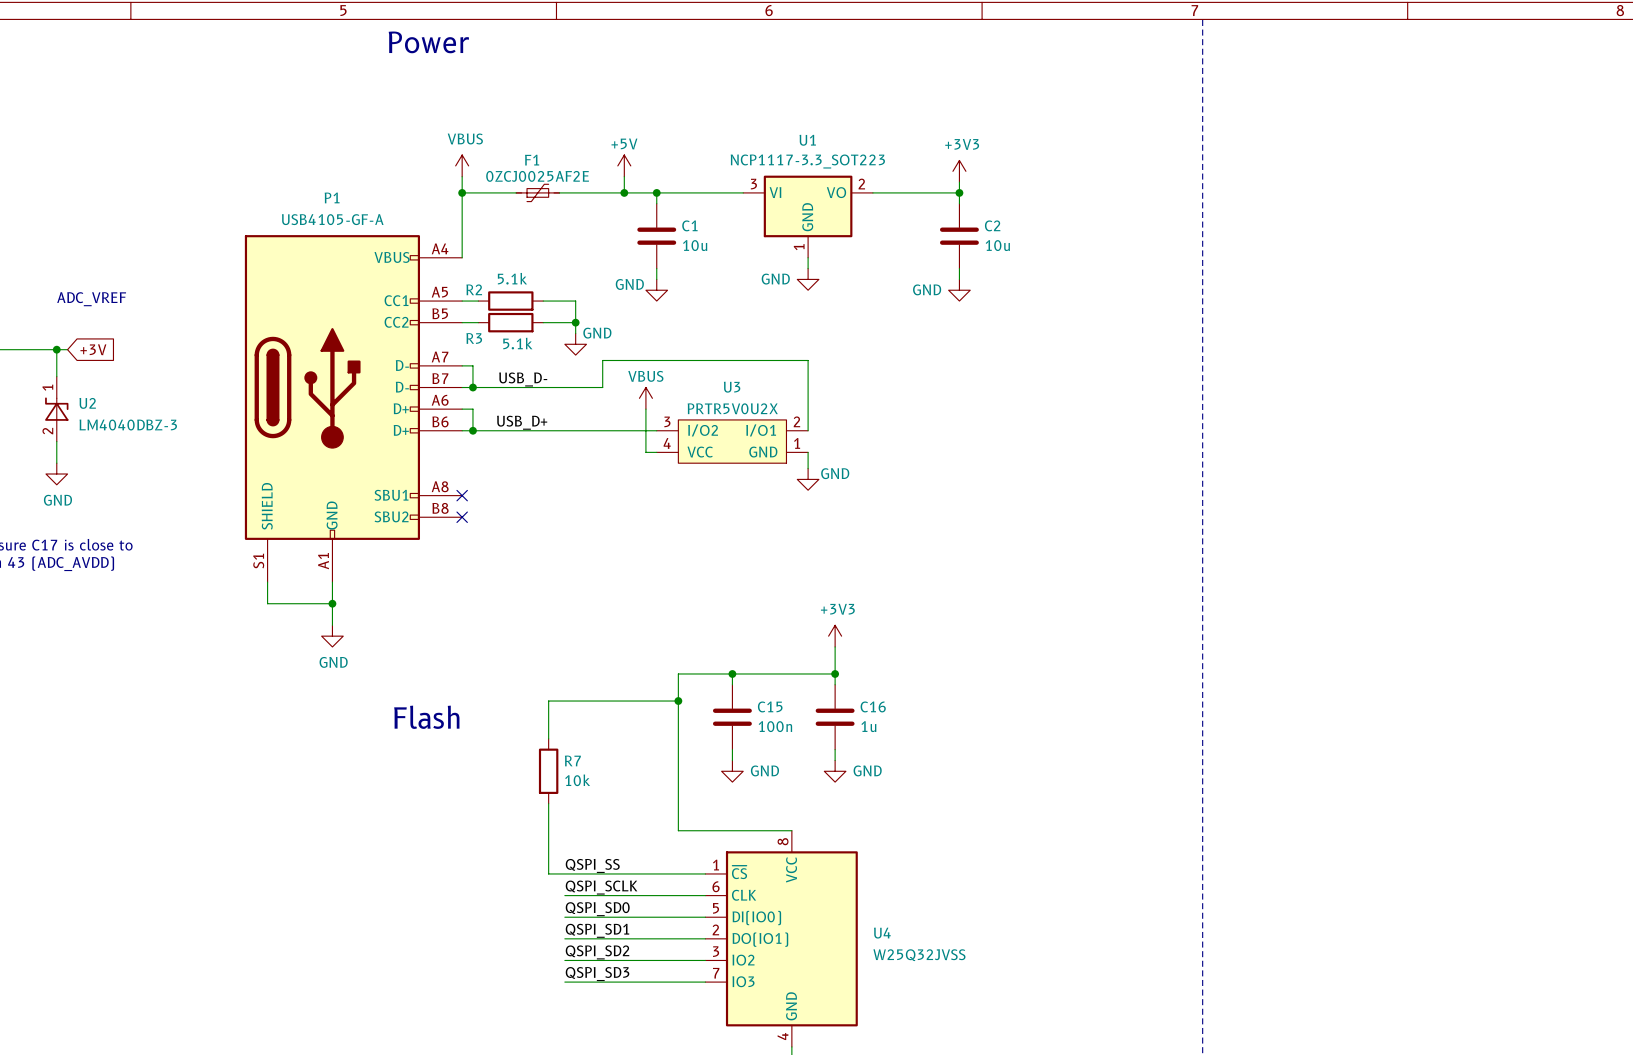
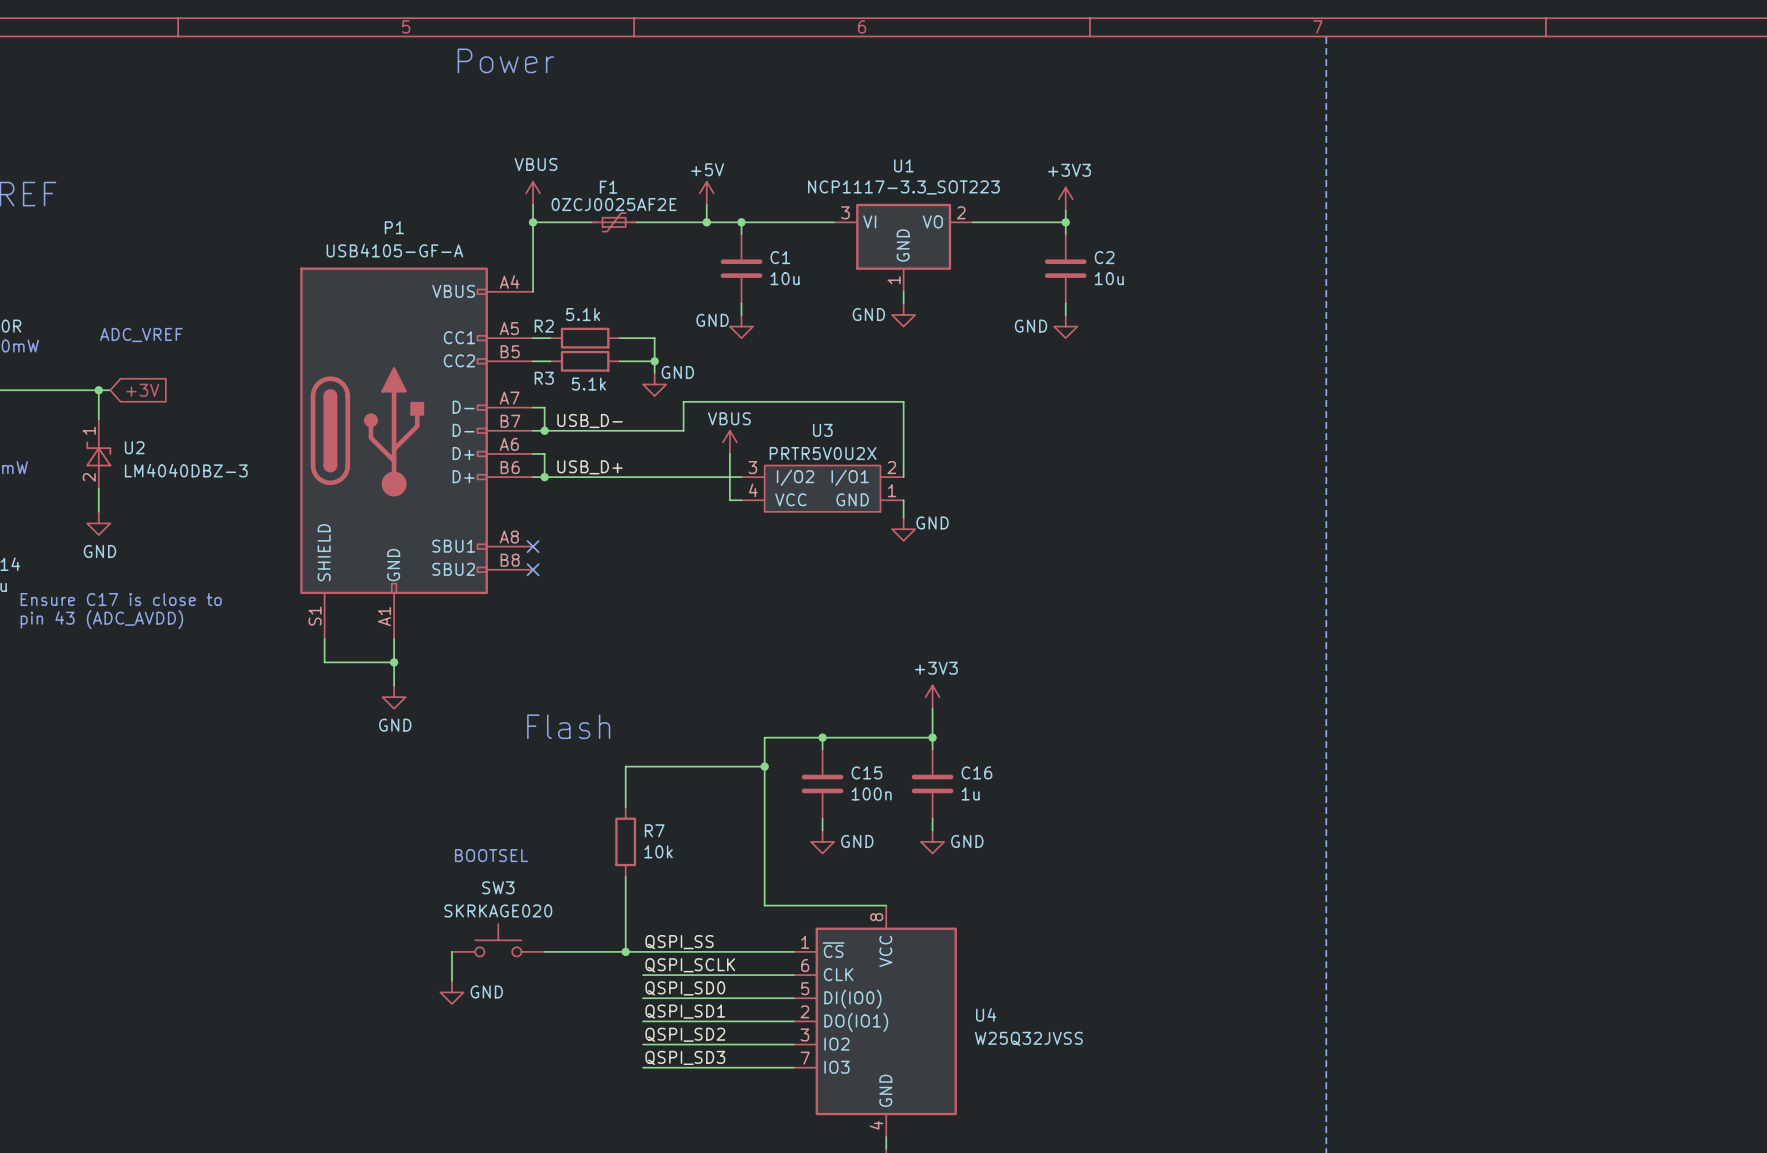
text position: Flash (426, 717) -> Flash (568, 726)
text: none -> BOOTSEL (491, 855)
SW3: none -> SKRKAGE020 (498, 940)
wire: none -> (451, 951) (451, 980)
wire: none -> (544, 951) (625, 951)
junction: none -> (625, 951)
power symbol: none -> GND (451, 992)

